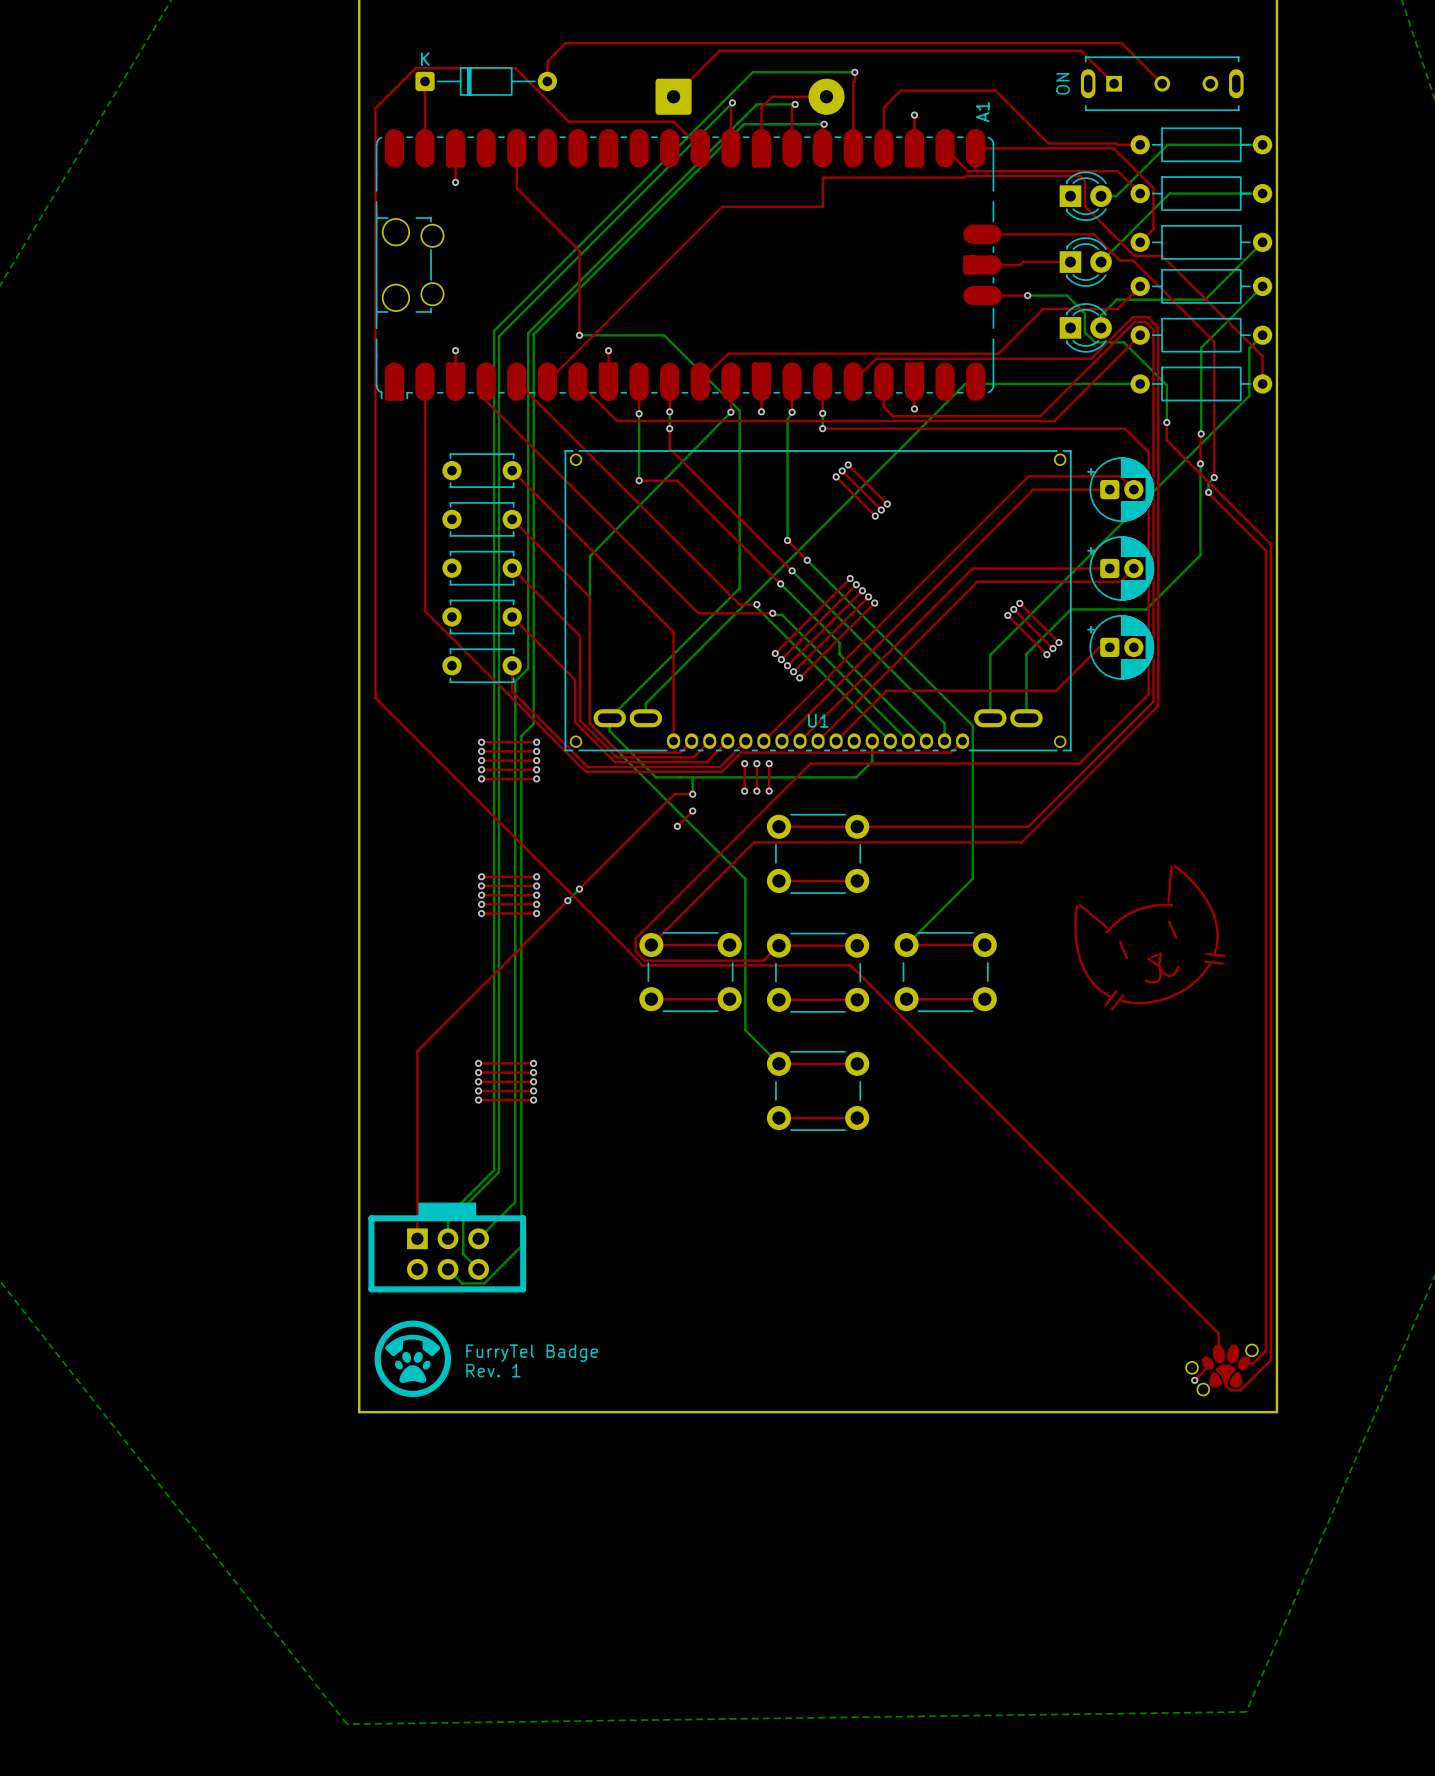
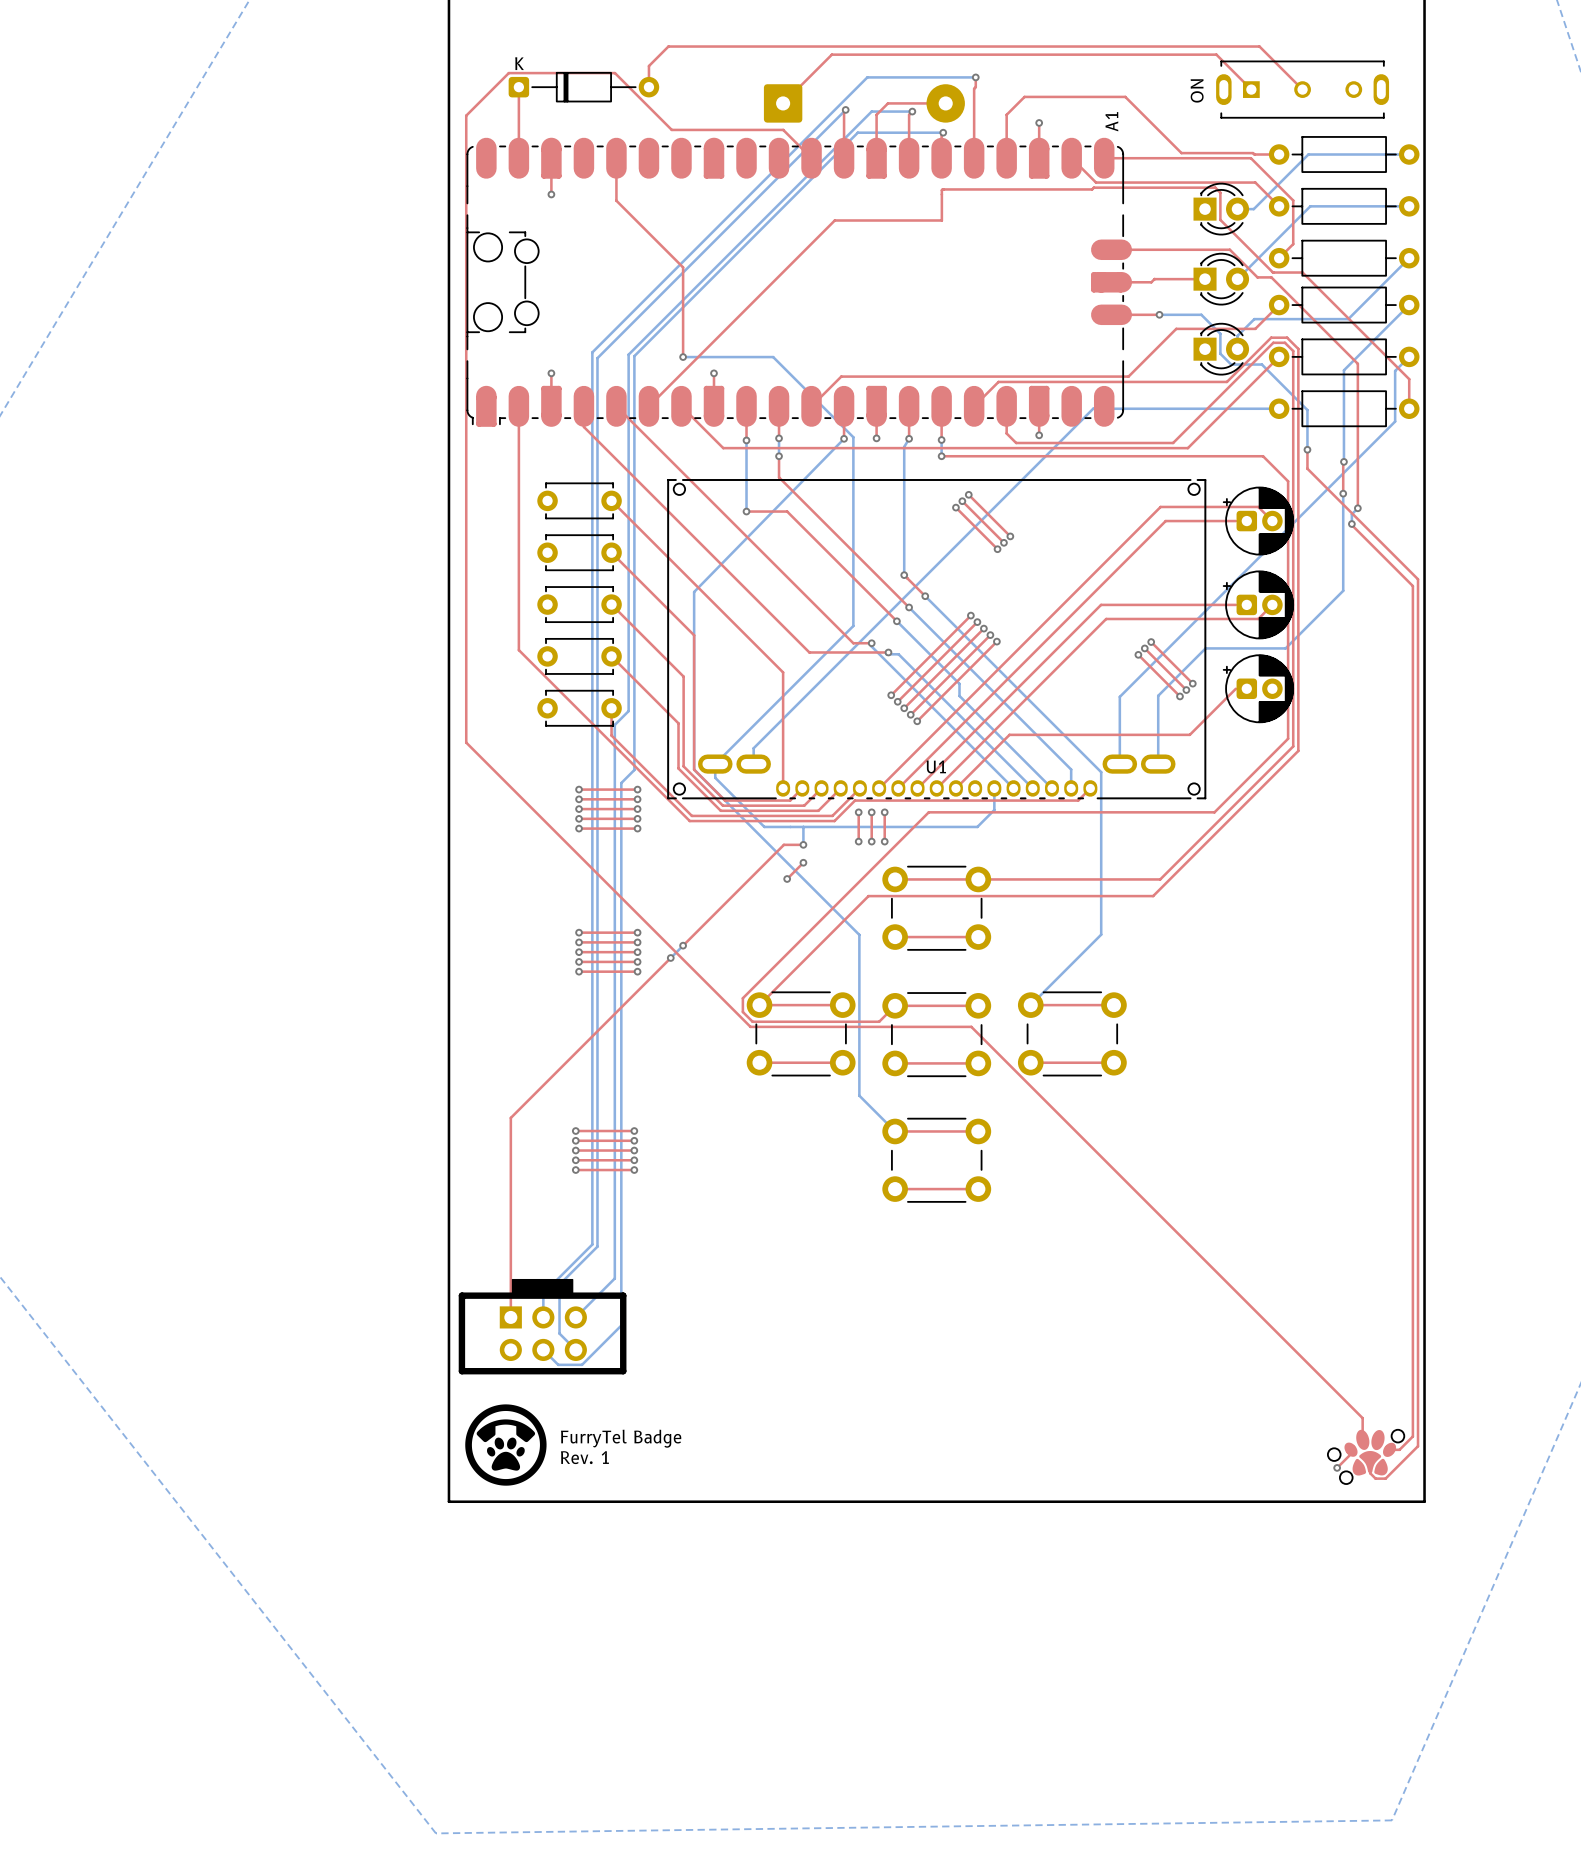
top track: (1174, 865) (1193, 883) (1210, 906) (1217, 927) (1215, 952) -> none
top track: (1171, 866) (1168, 902) -> none
top track: (1079, 904) (1107, 927) -> none
top track: (1172, 905) (1153, 905) (1135, 910) (1120, 919) (1106, 932) -> none
top track: (1076, 906) (1075, 932) (1080, 959) (1090, 980) (1109, 996) -> none
top track: (1169, 921) (1176, 937) -> none
top track: (1120, 941) (1126, 958) -> none
top track: (1160, 953) (1159, 963) -> none
top track: (1158, 954) (1151, 957) -> none
top track: (1206, 954) (1224, 955) -> none
top track: (1148, 958) (1156, 964) -> none
top track: (1205, 961) (1222, 963) -> none
top track: (1209, 964) (1193, 983) (1171, 996) (1146, 1002) (1121, 1000) -> none
top track: (1178, 967) (1174, 973) (1168, 975) (1163, 972) (1158, 965) (1160, 974) (1158, 979) (1153, 982) (1145, 980) -> none
top track: (1116, 991) (1105, 1005) -> none
top track: (1123, 995) (1112, 1009) -> none

